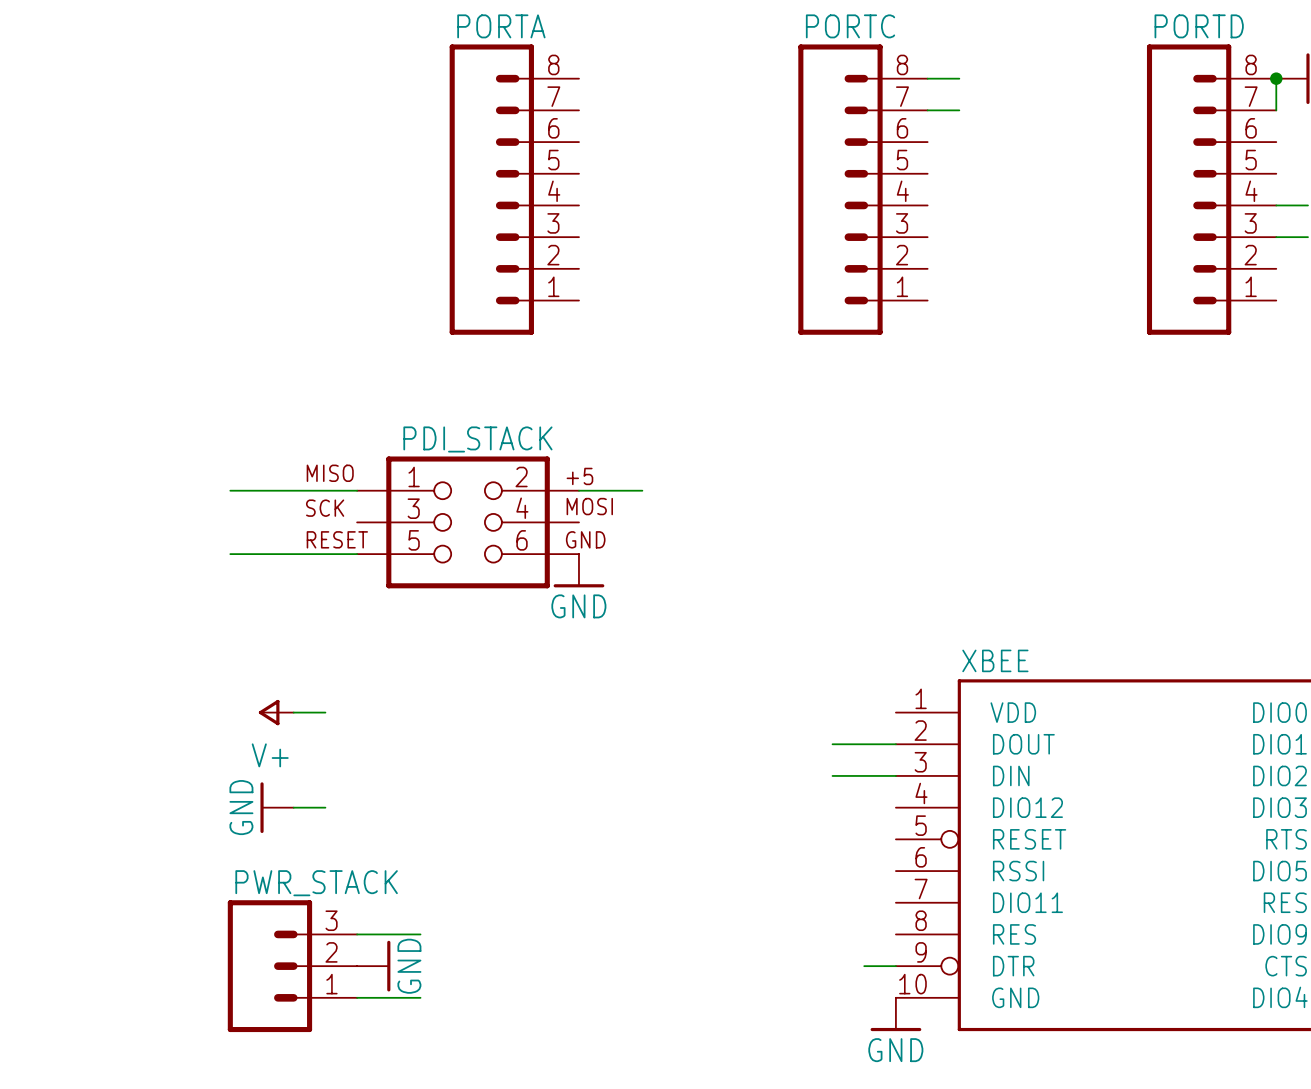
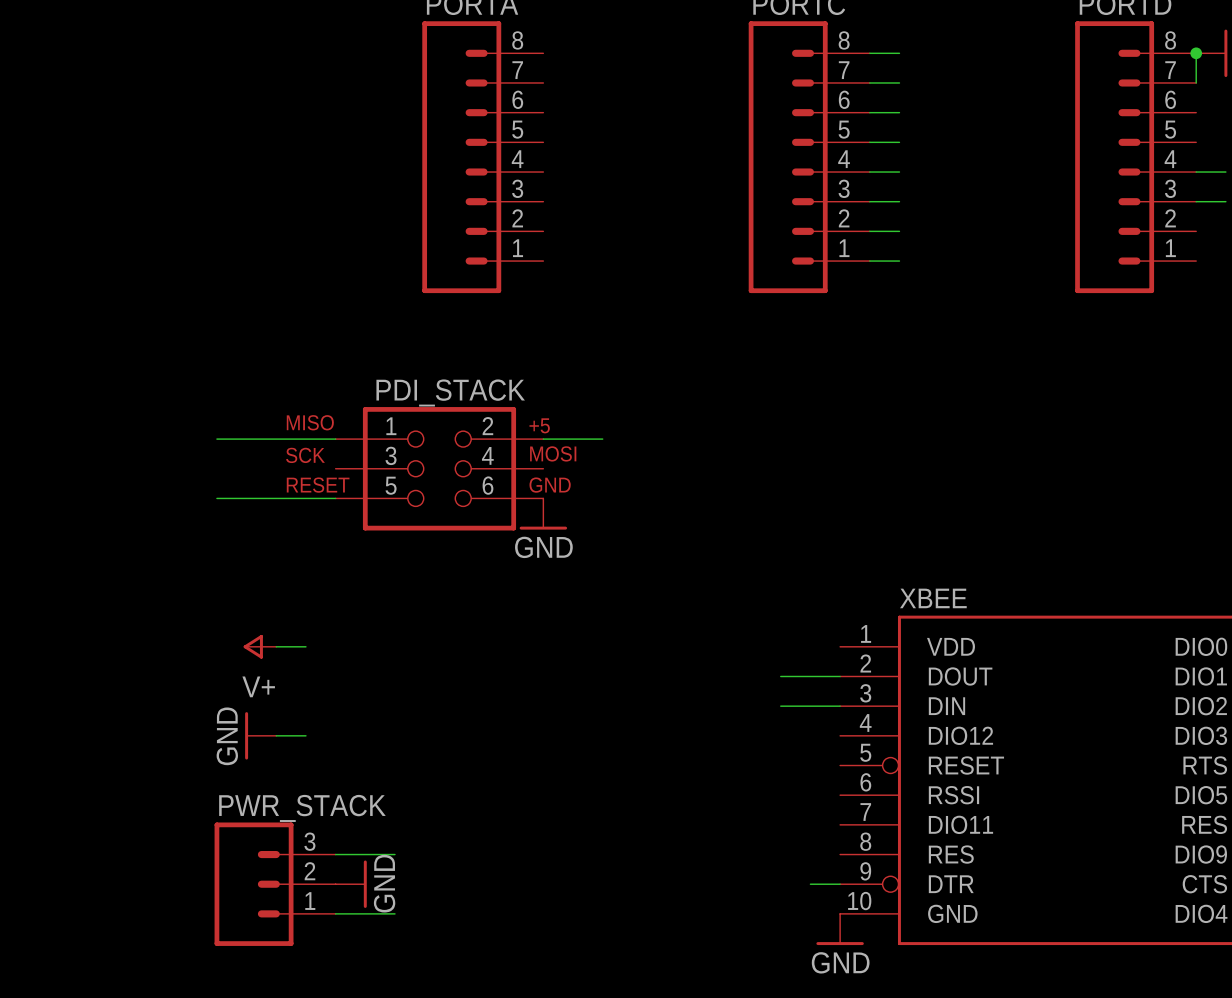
wire: none -> (869, 112) (899, 112)
wire: none -> (869, 142) (899, 142)
wire: none -> (869, 172) (899, 172)
wire: none -> (869, 201) (899, 201)
wire: none -> (869, 231) (899, 231)
wire: none -> (869, 261) (899, 261)

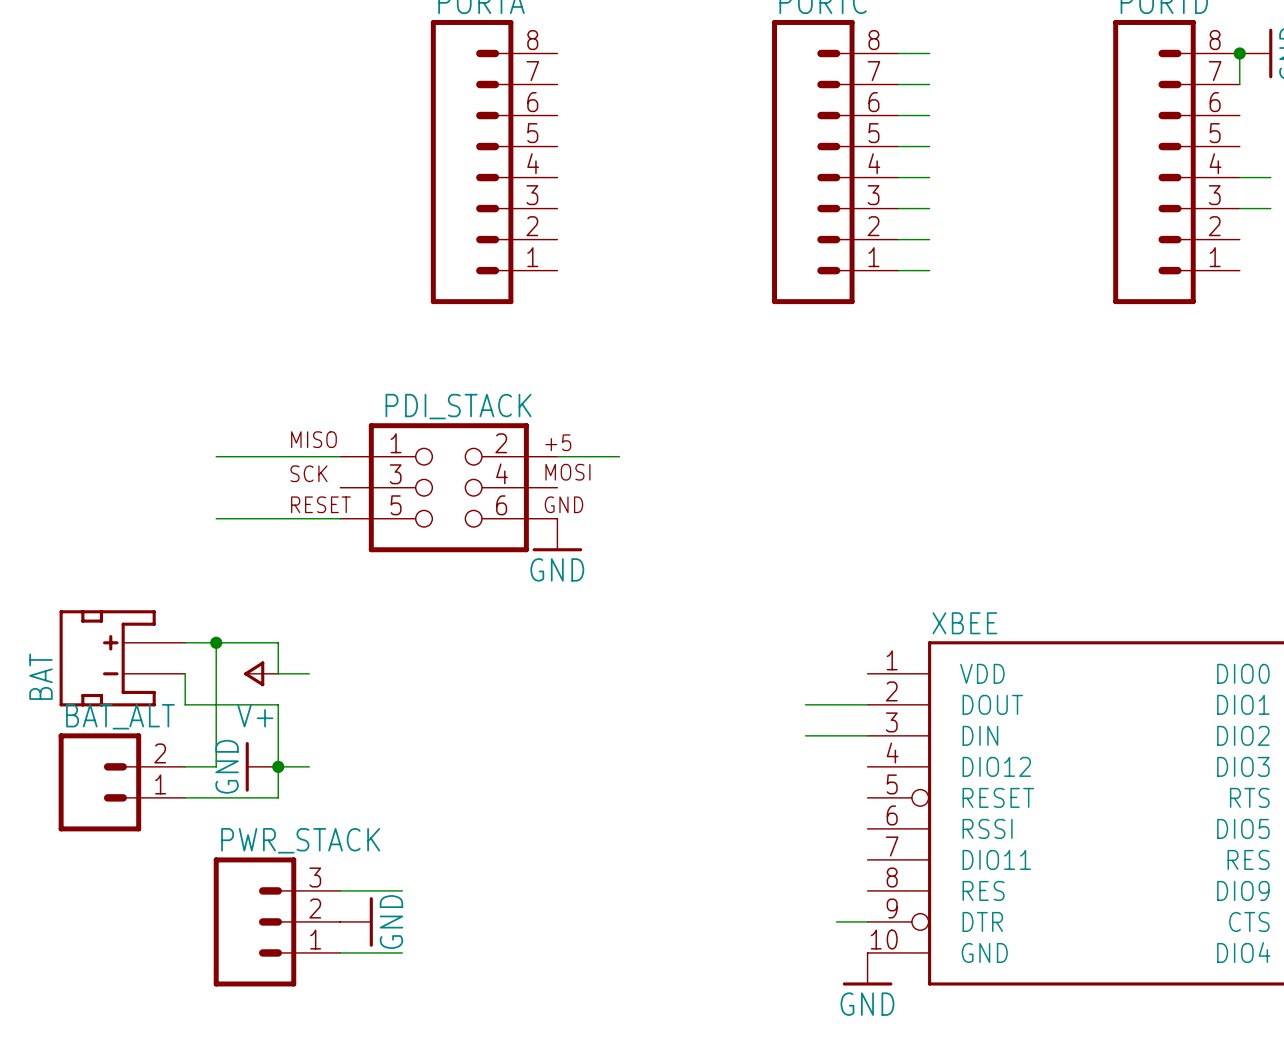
wire: none -> (185, 642) (278, 642) (278, 673)
wire: none -> (216, 642) (216, 766) (185, 766)
junction: none -> (216, 642)
BAT: none -> (122, 658)
wire: none -> (185, 673) (185, 704) (278, 704) (278, 797) (185, 797)
junction: none -> (278, 766)
BAT_ALT: none -> (121, 782)

